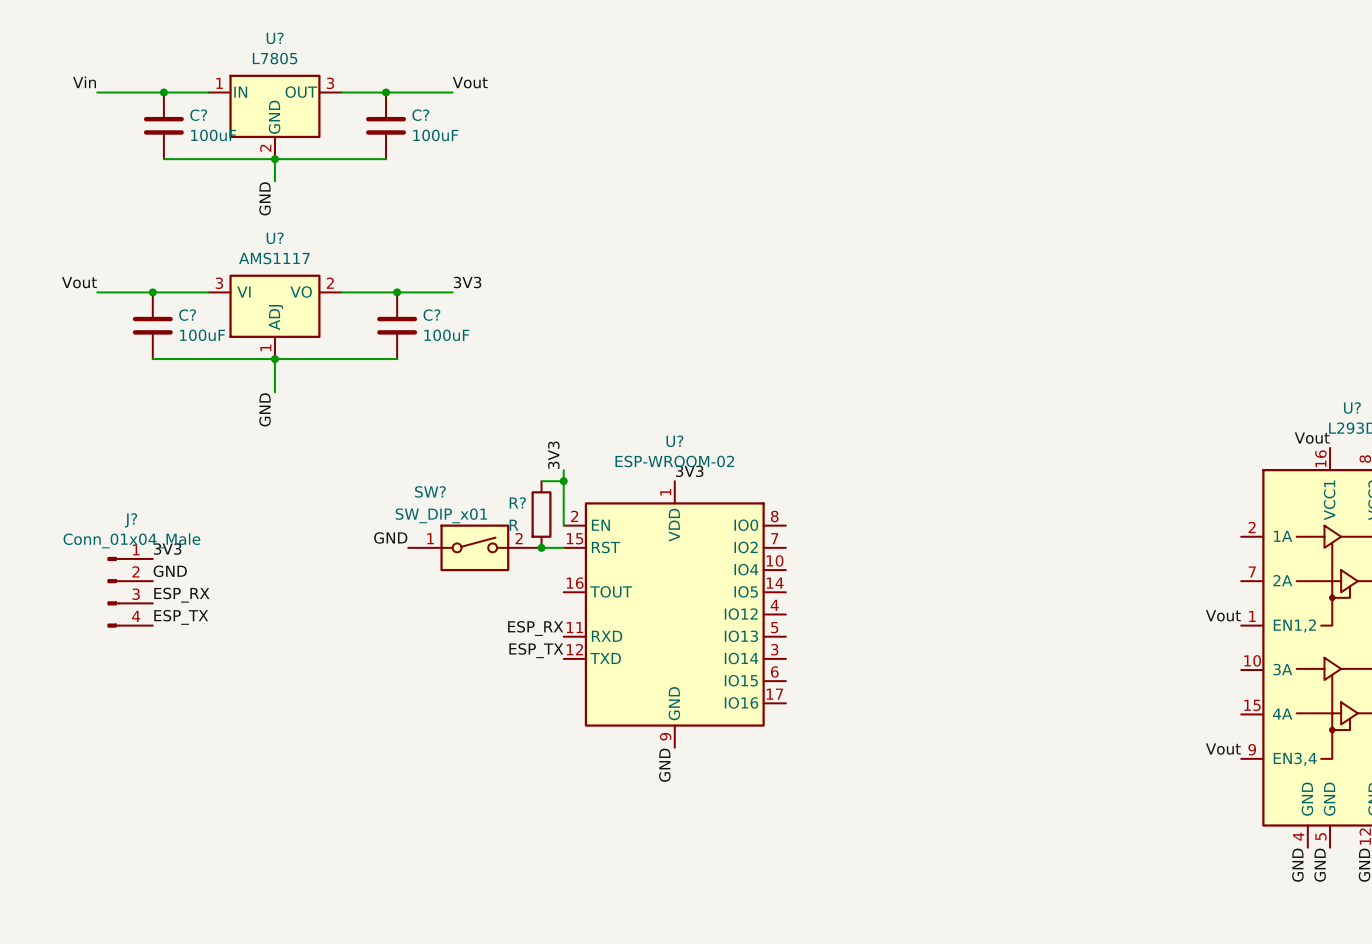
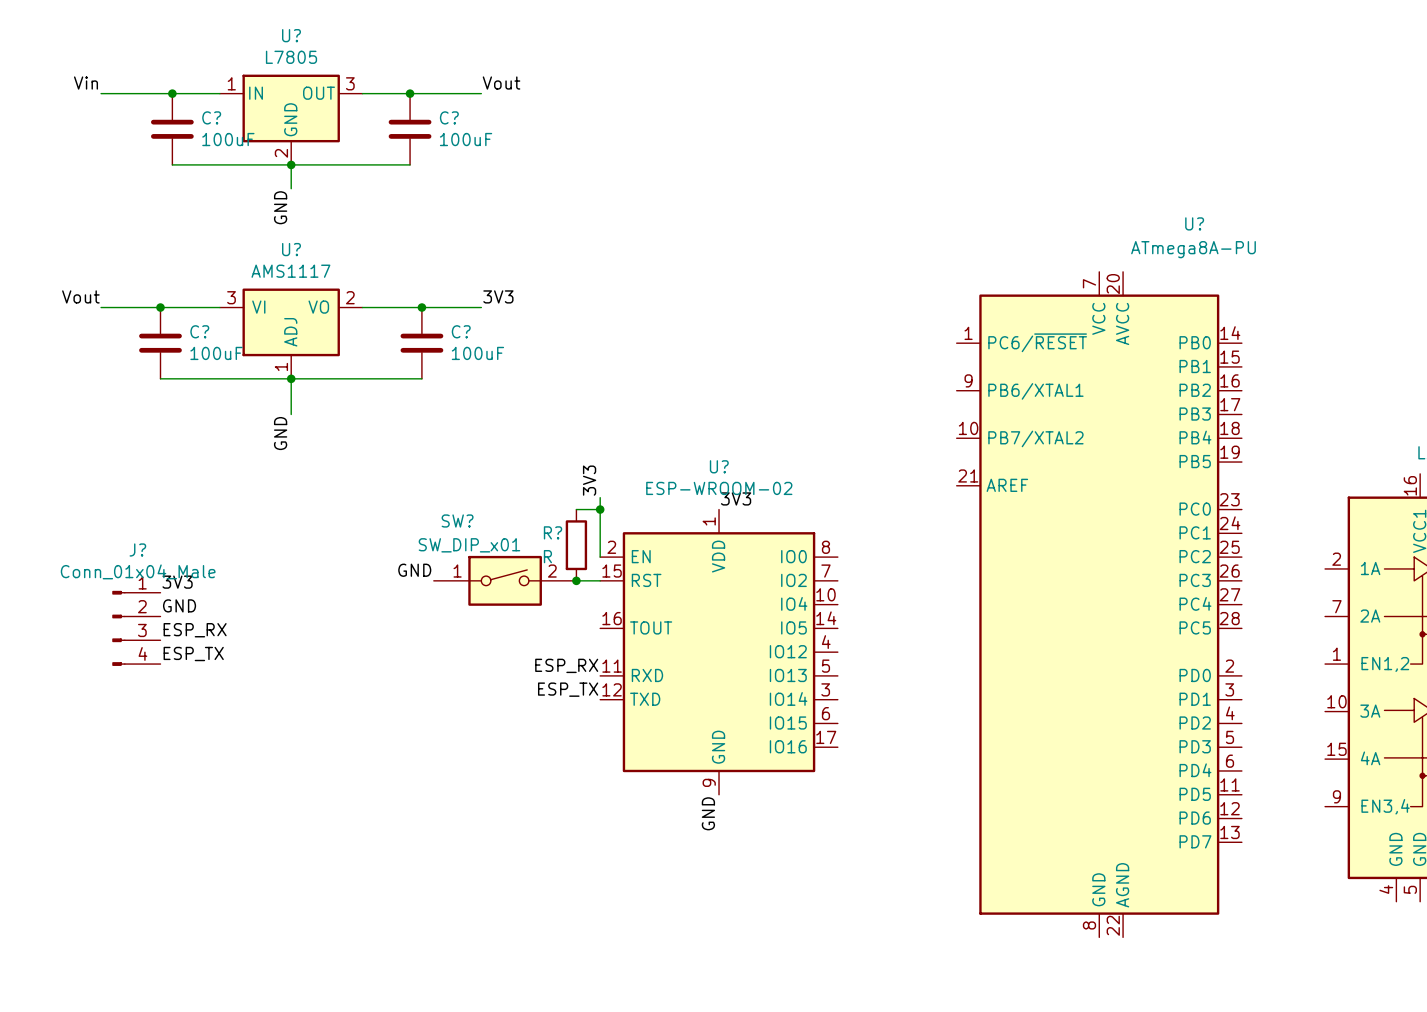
label: Vout (1312, 438) -> none
U?: none -> ATmega8A-PU (1099, 604)
label: Vout (1223, 615) -> none
label: Vout (1223, 749) -> none
label: GND (1297, 865) -> none
label: GND (1320, 865) -> none

